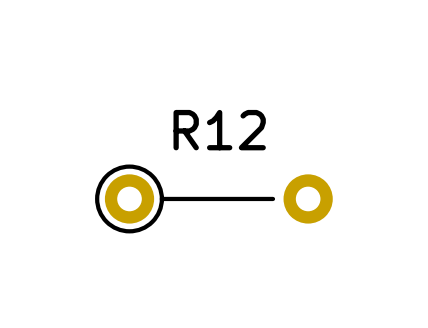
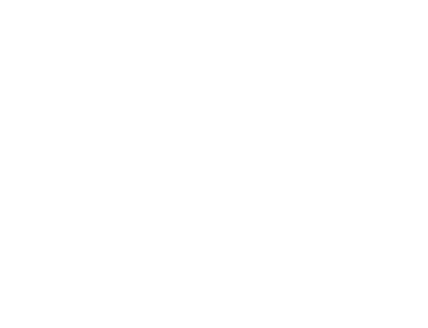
R12: (213, 198) -> none

